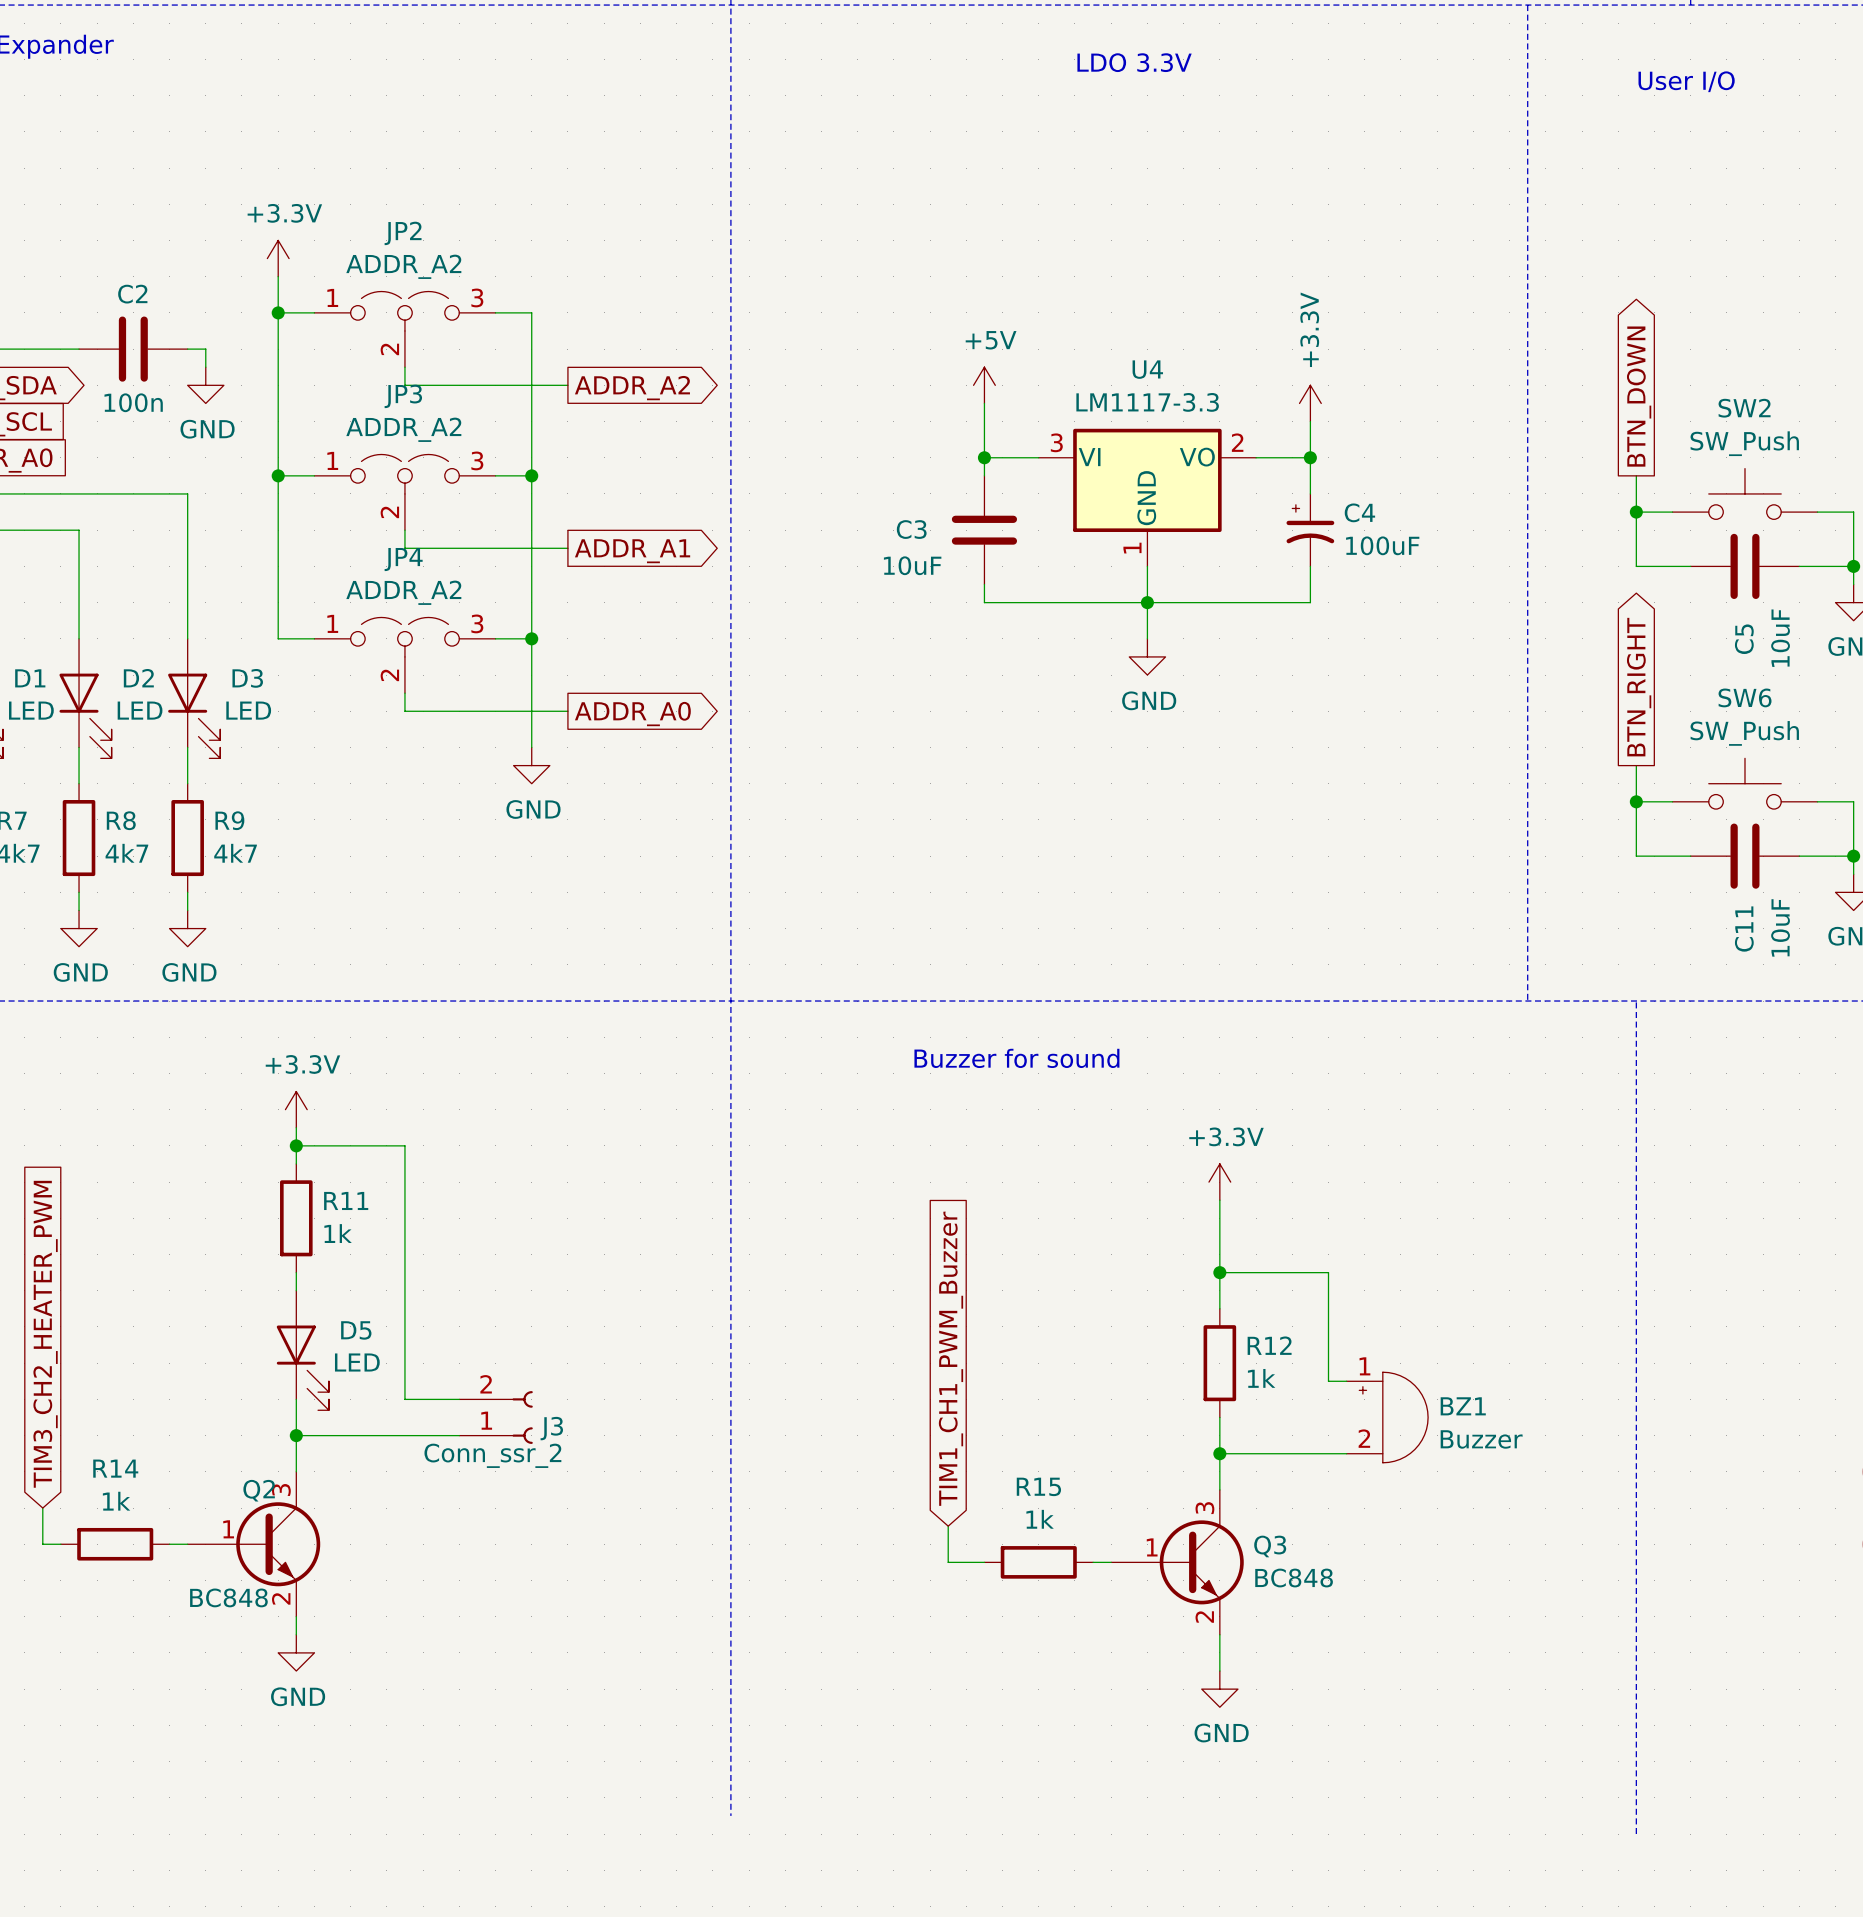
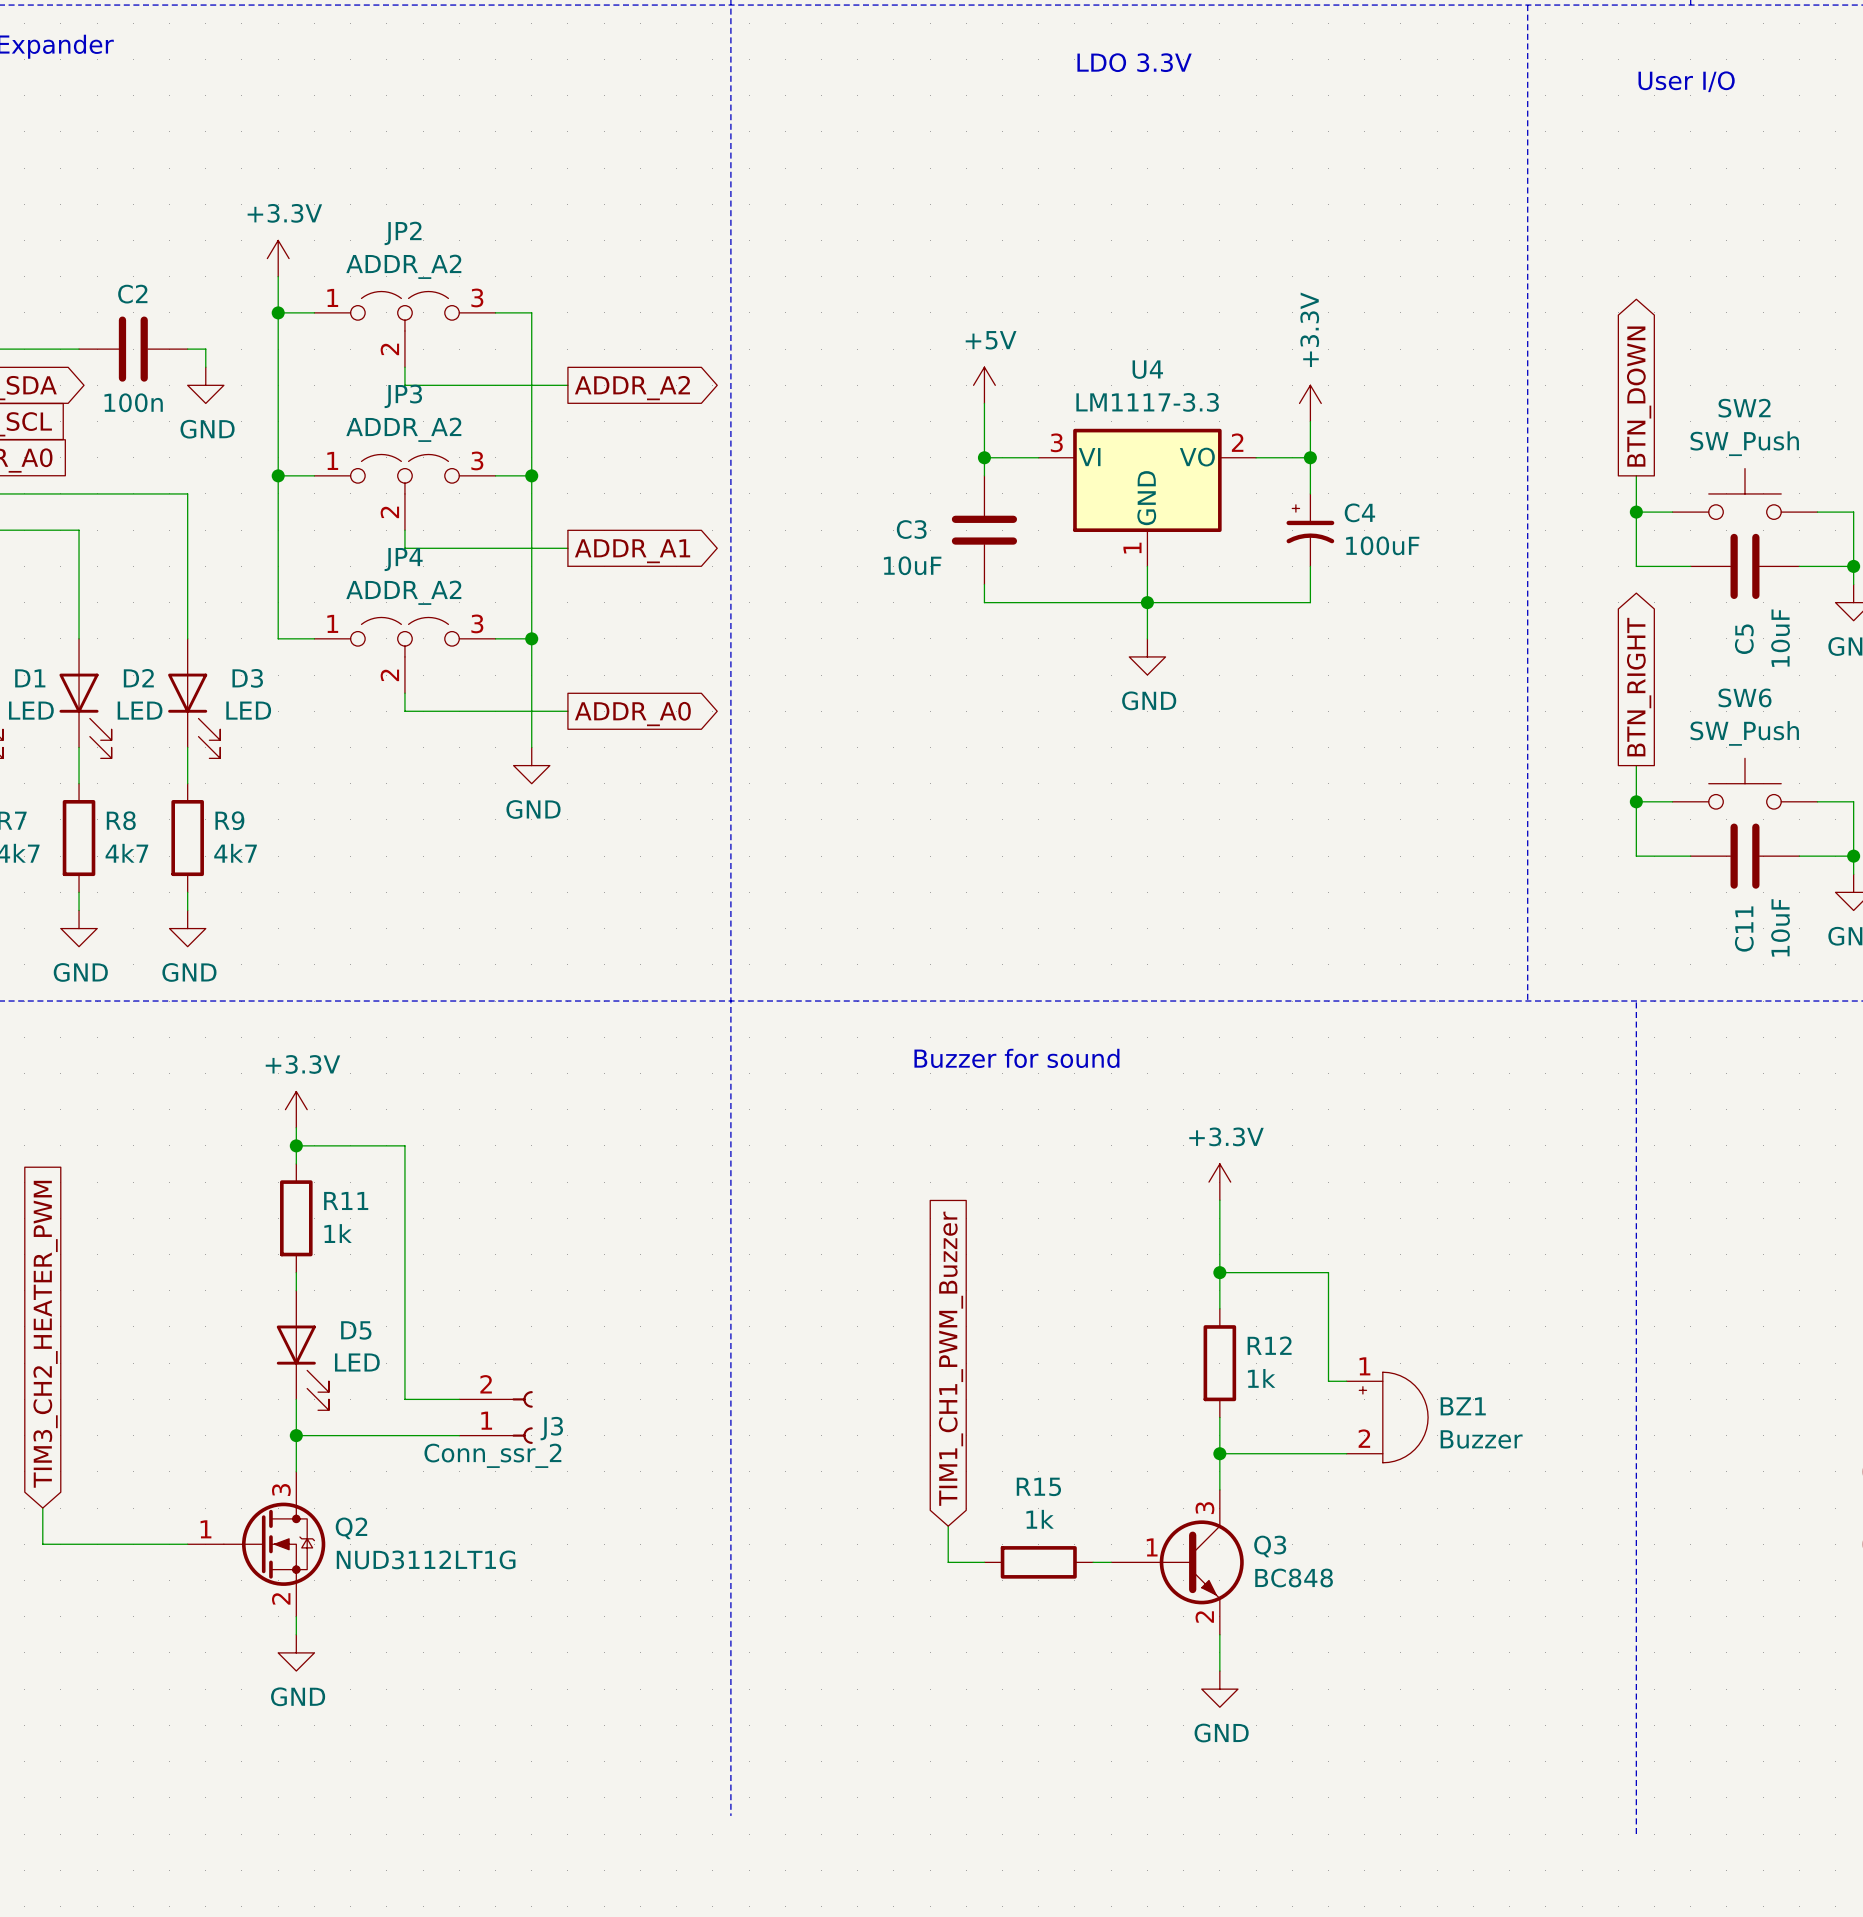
Q2 symbol: [187, 1471, 321, 1617] -> [187, 1471, 326, 1617]
Q2 name position: Q2 (259, 1490) -> Q2 (351, 1528)
wire: none -> (60, 1544) (169, 1544)
R14: 1k (115, 1544) -> none
Q2 value: BC848 (228, 1597) -> NUD3112LT1G (426, 1559)

